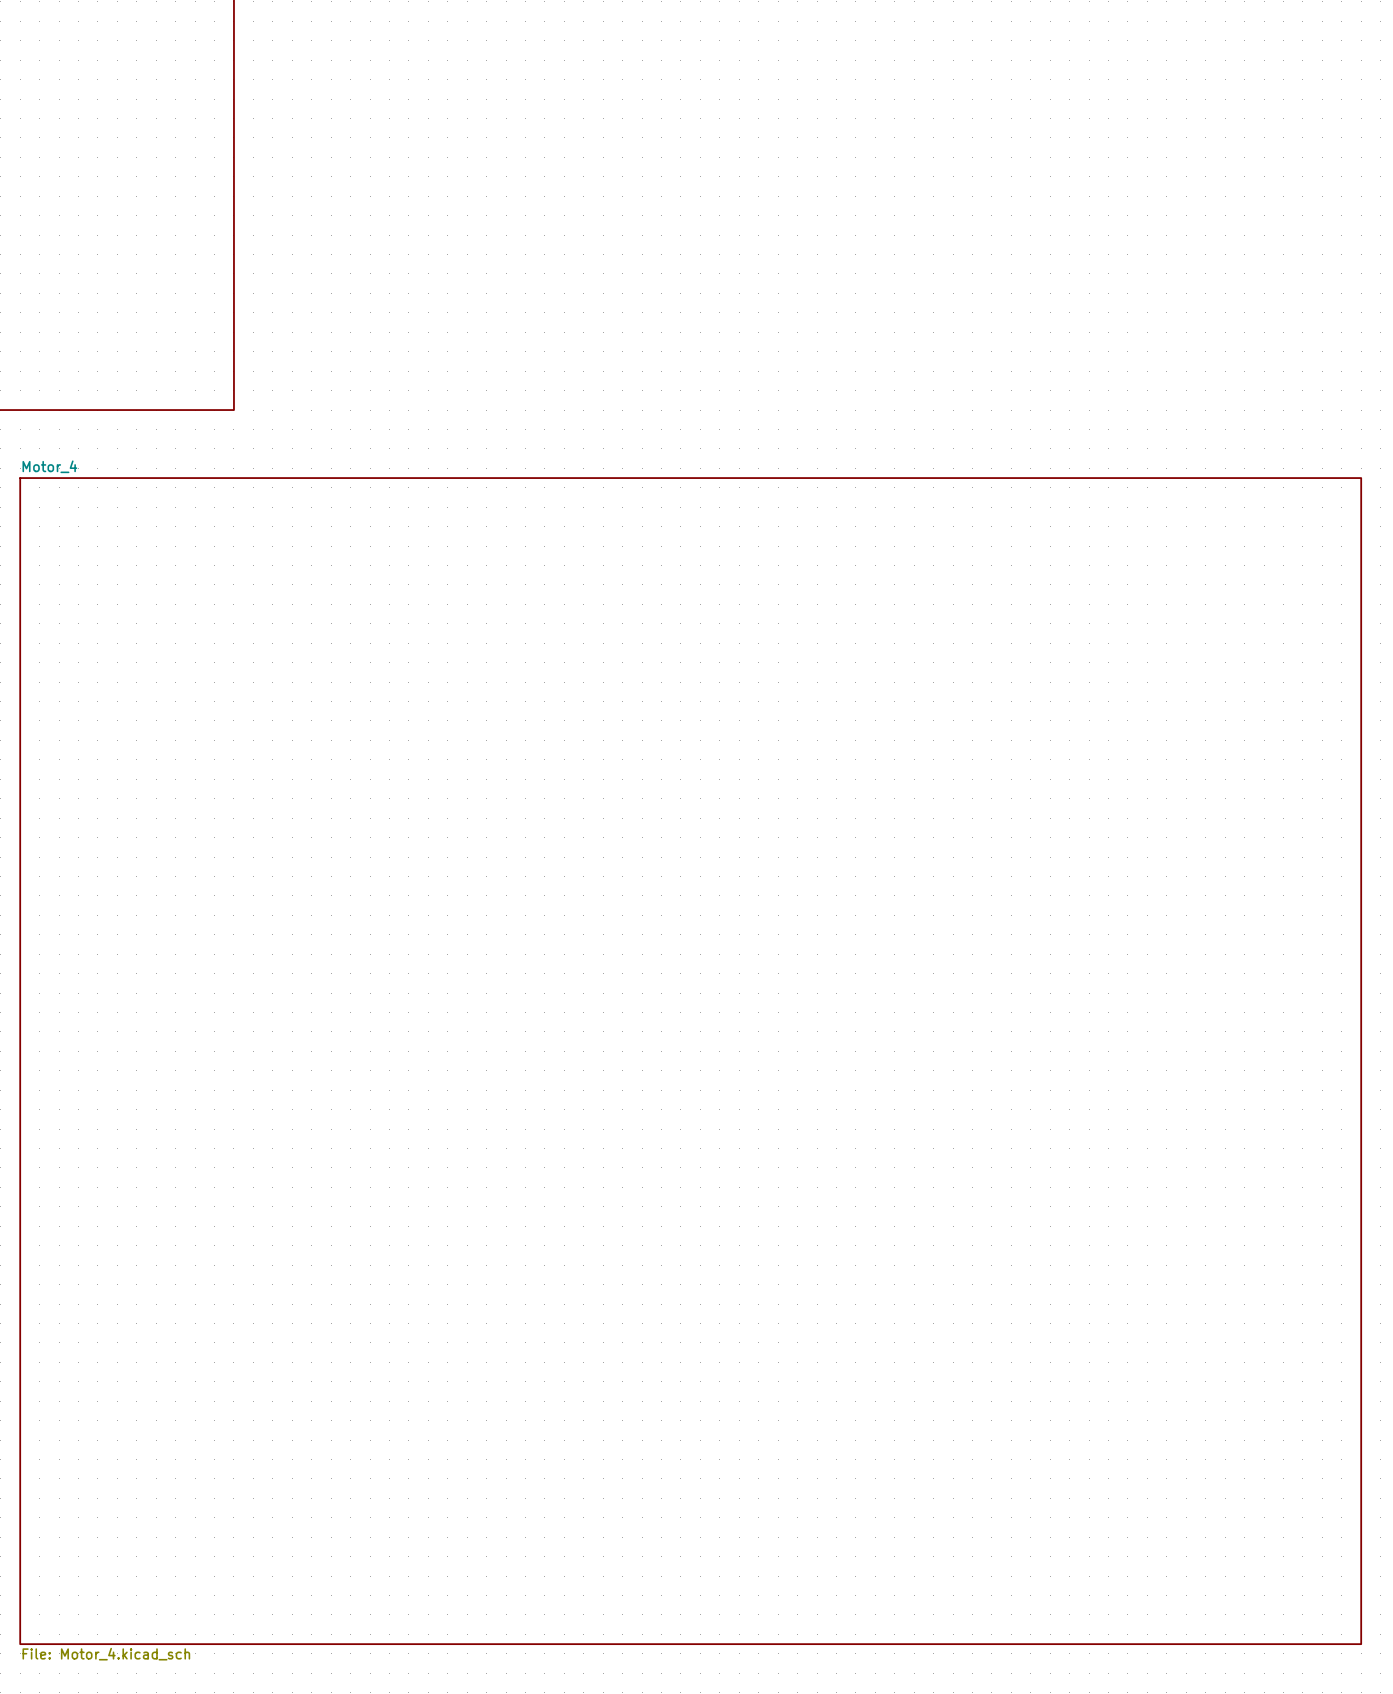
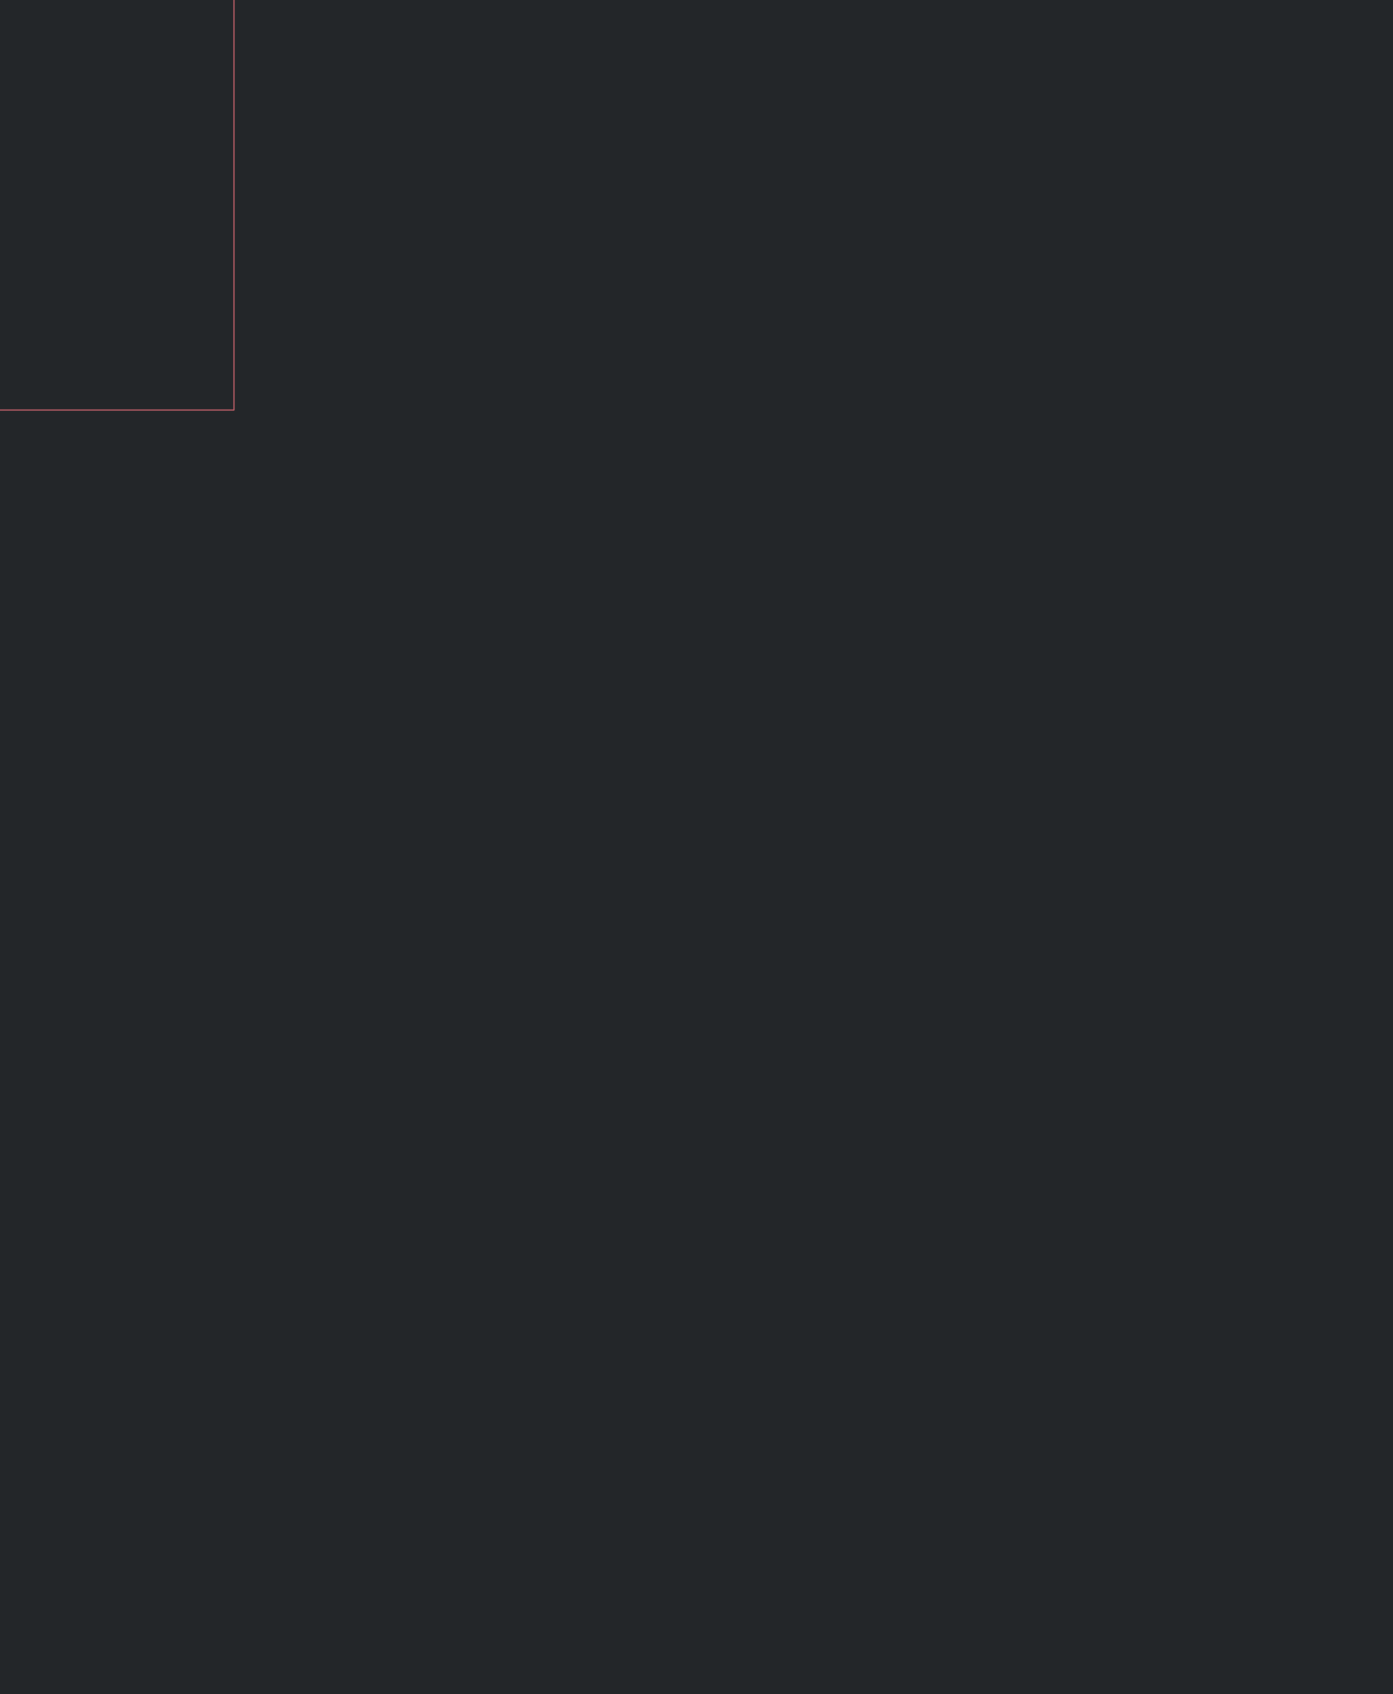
sheet Motor_4: File: Motor_4.kicad_sch (690, 1061) -> none

